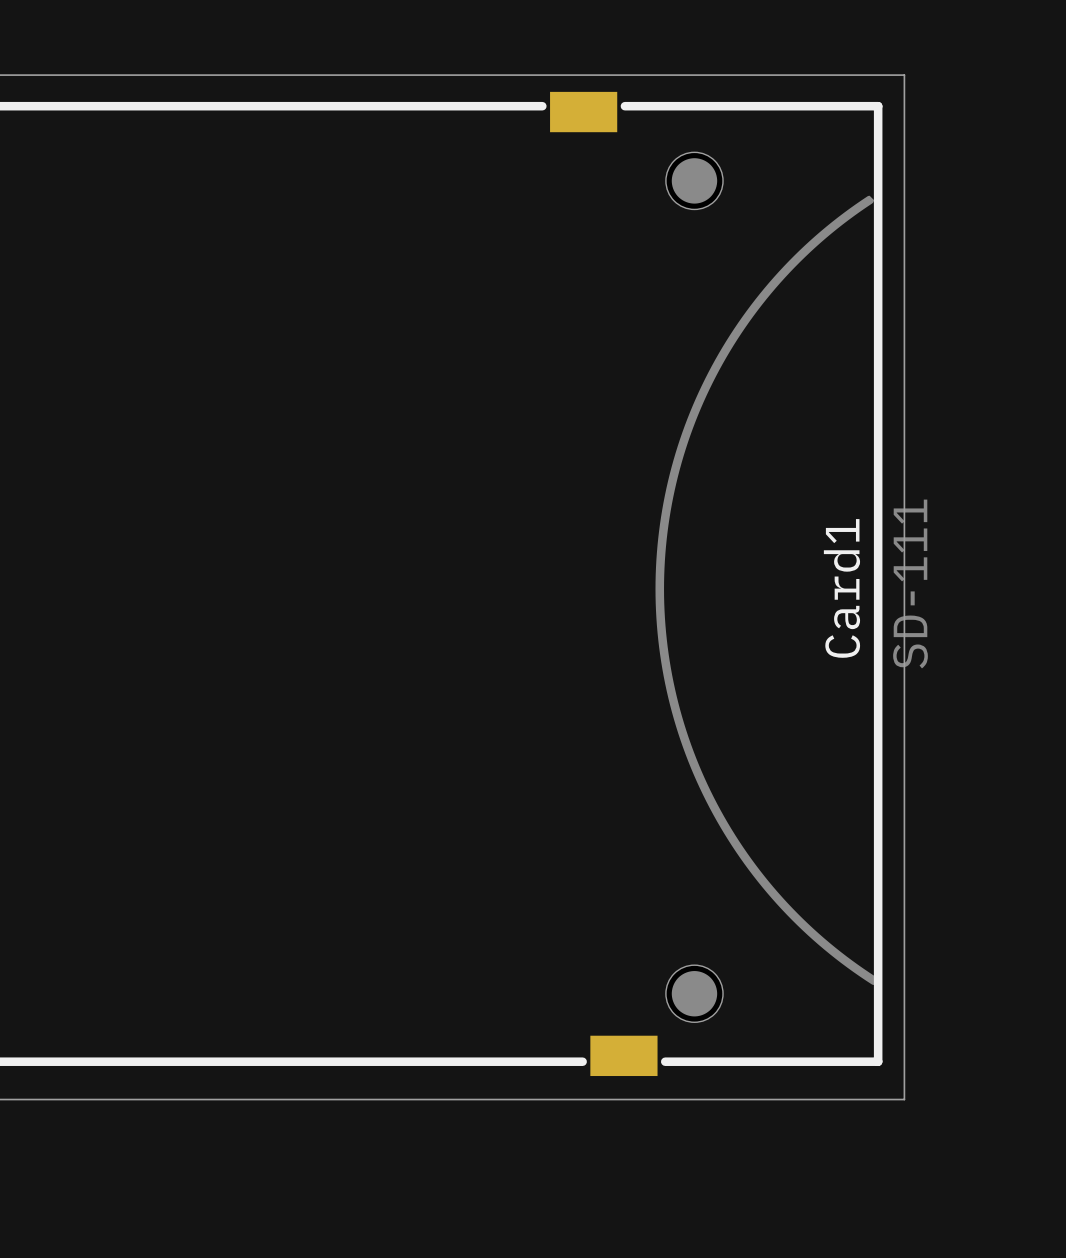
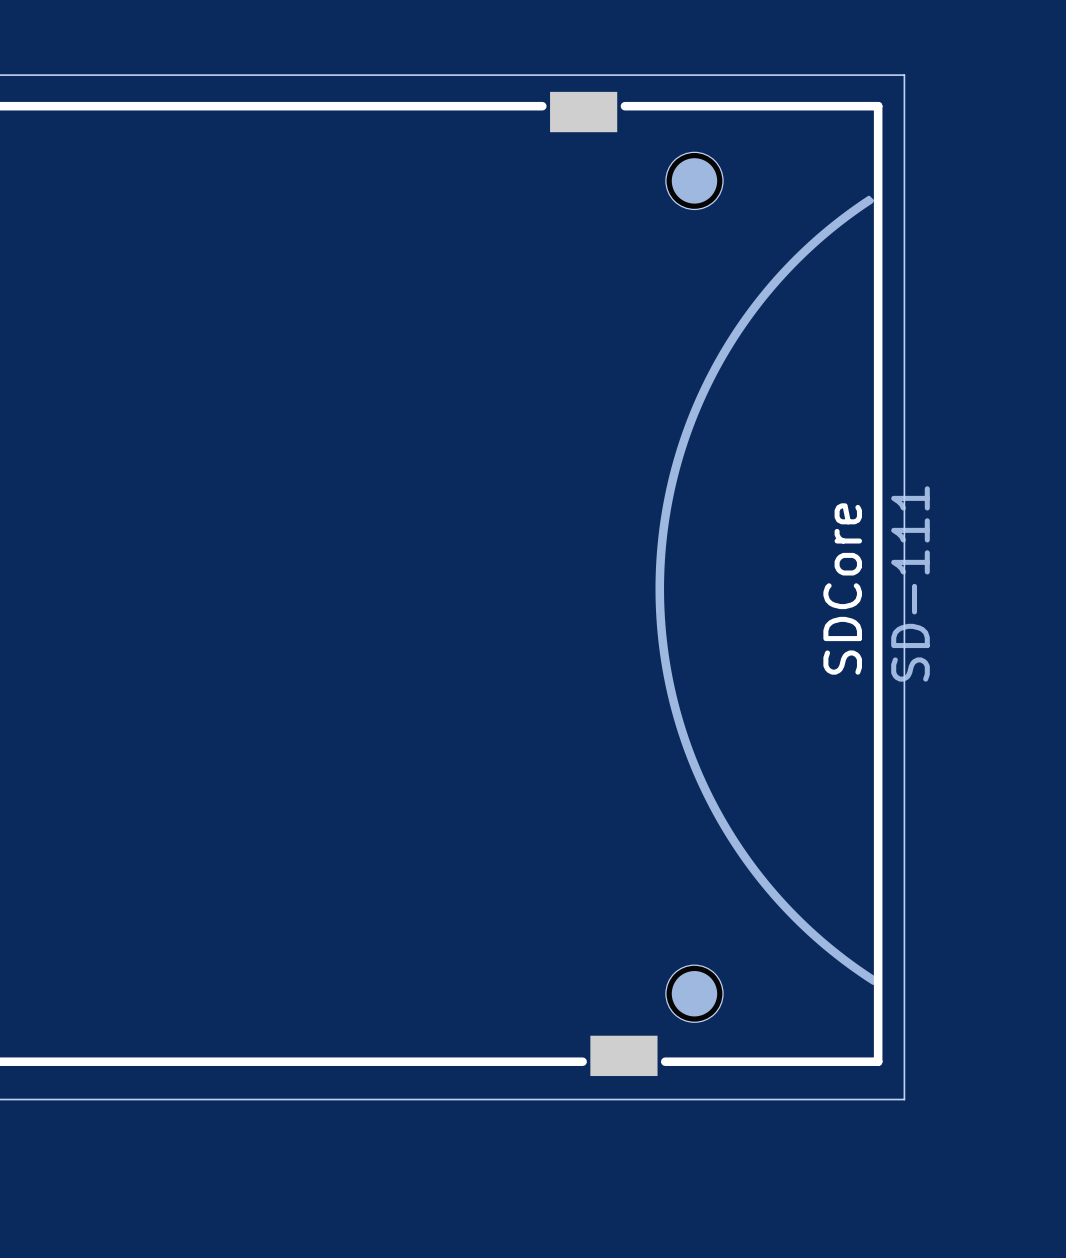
Card1 name: Card1 (841, 588) -> SDCore (842, 588)

